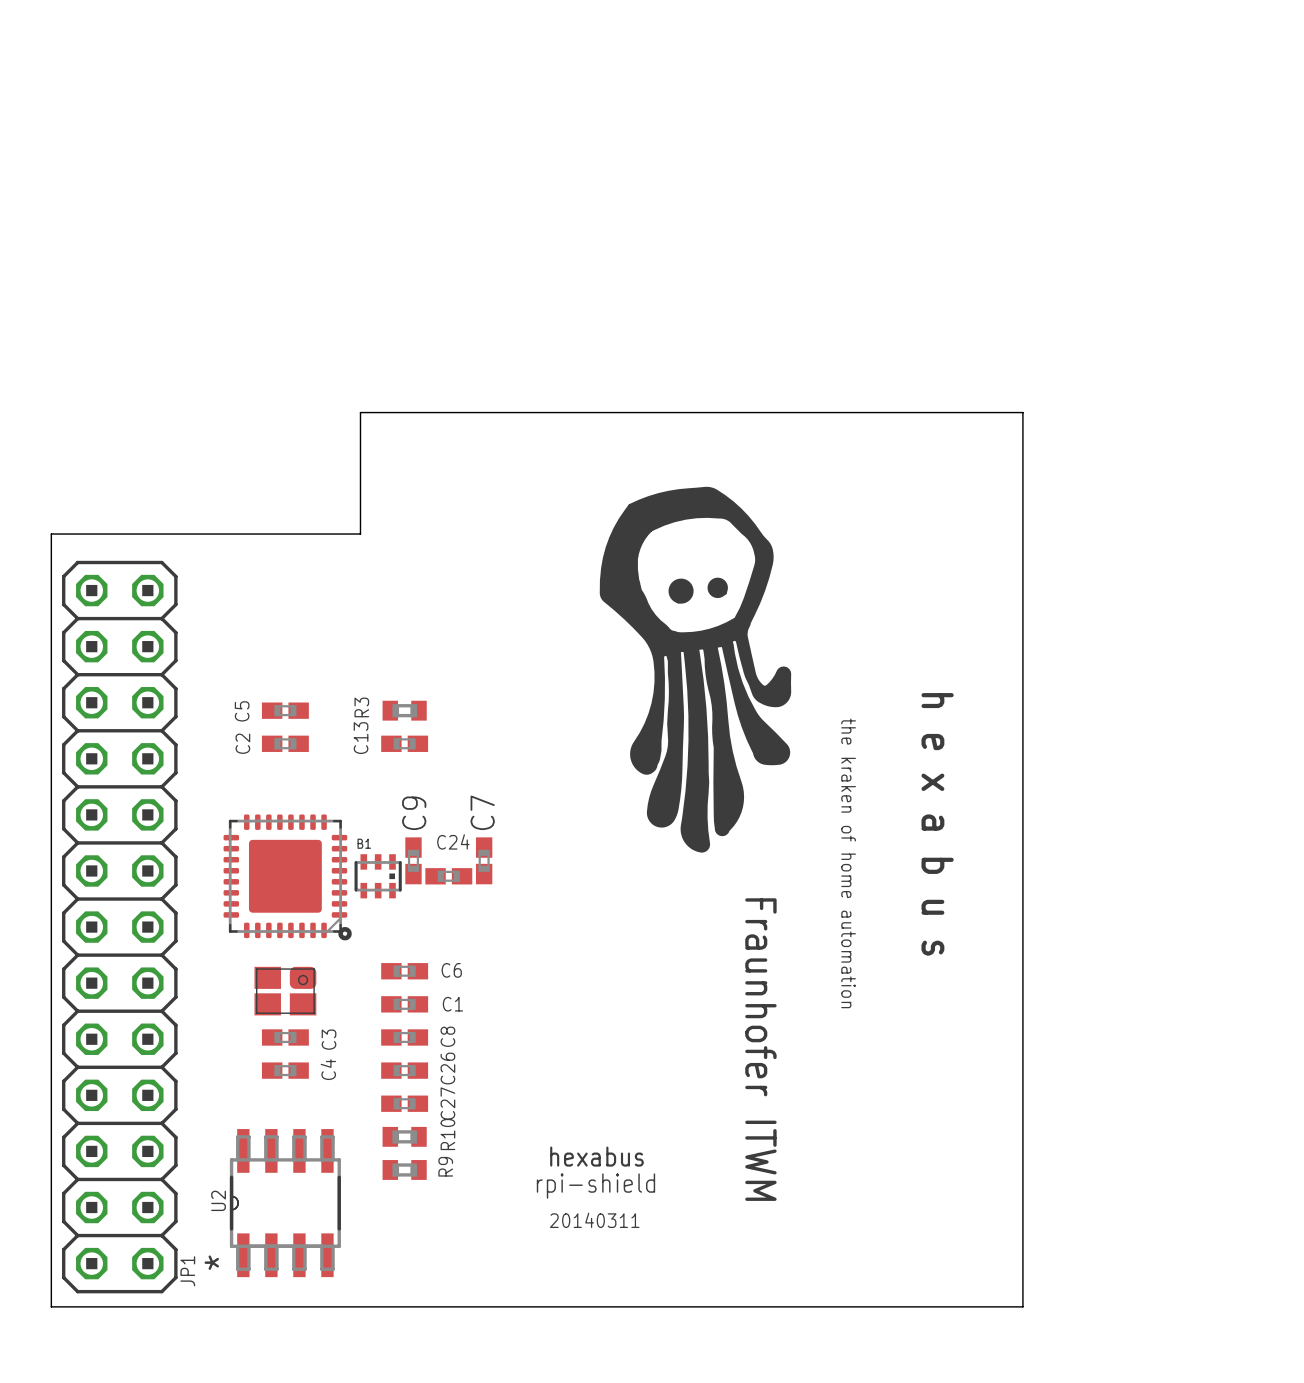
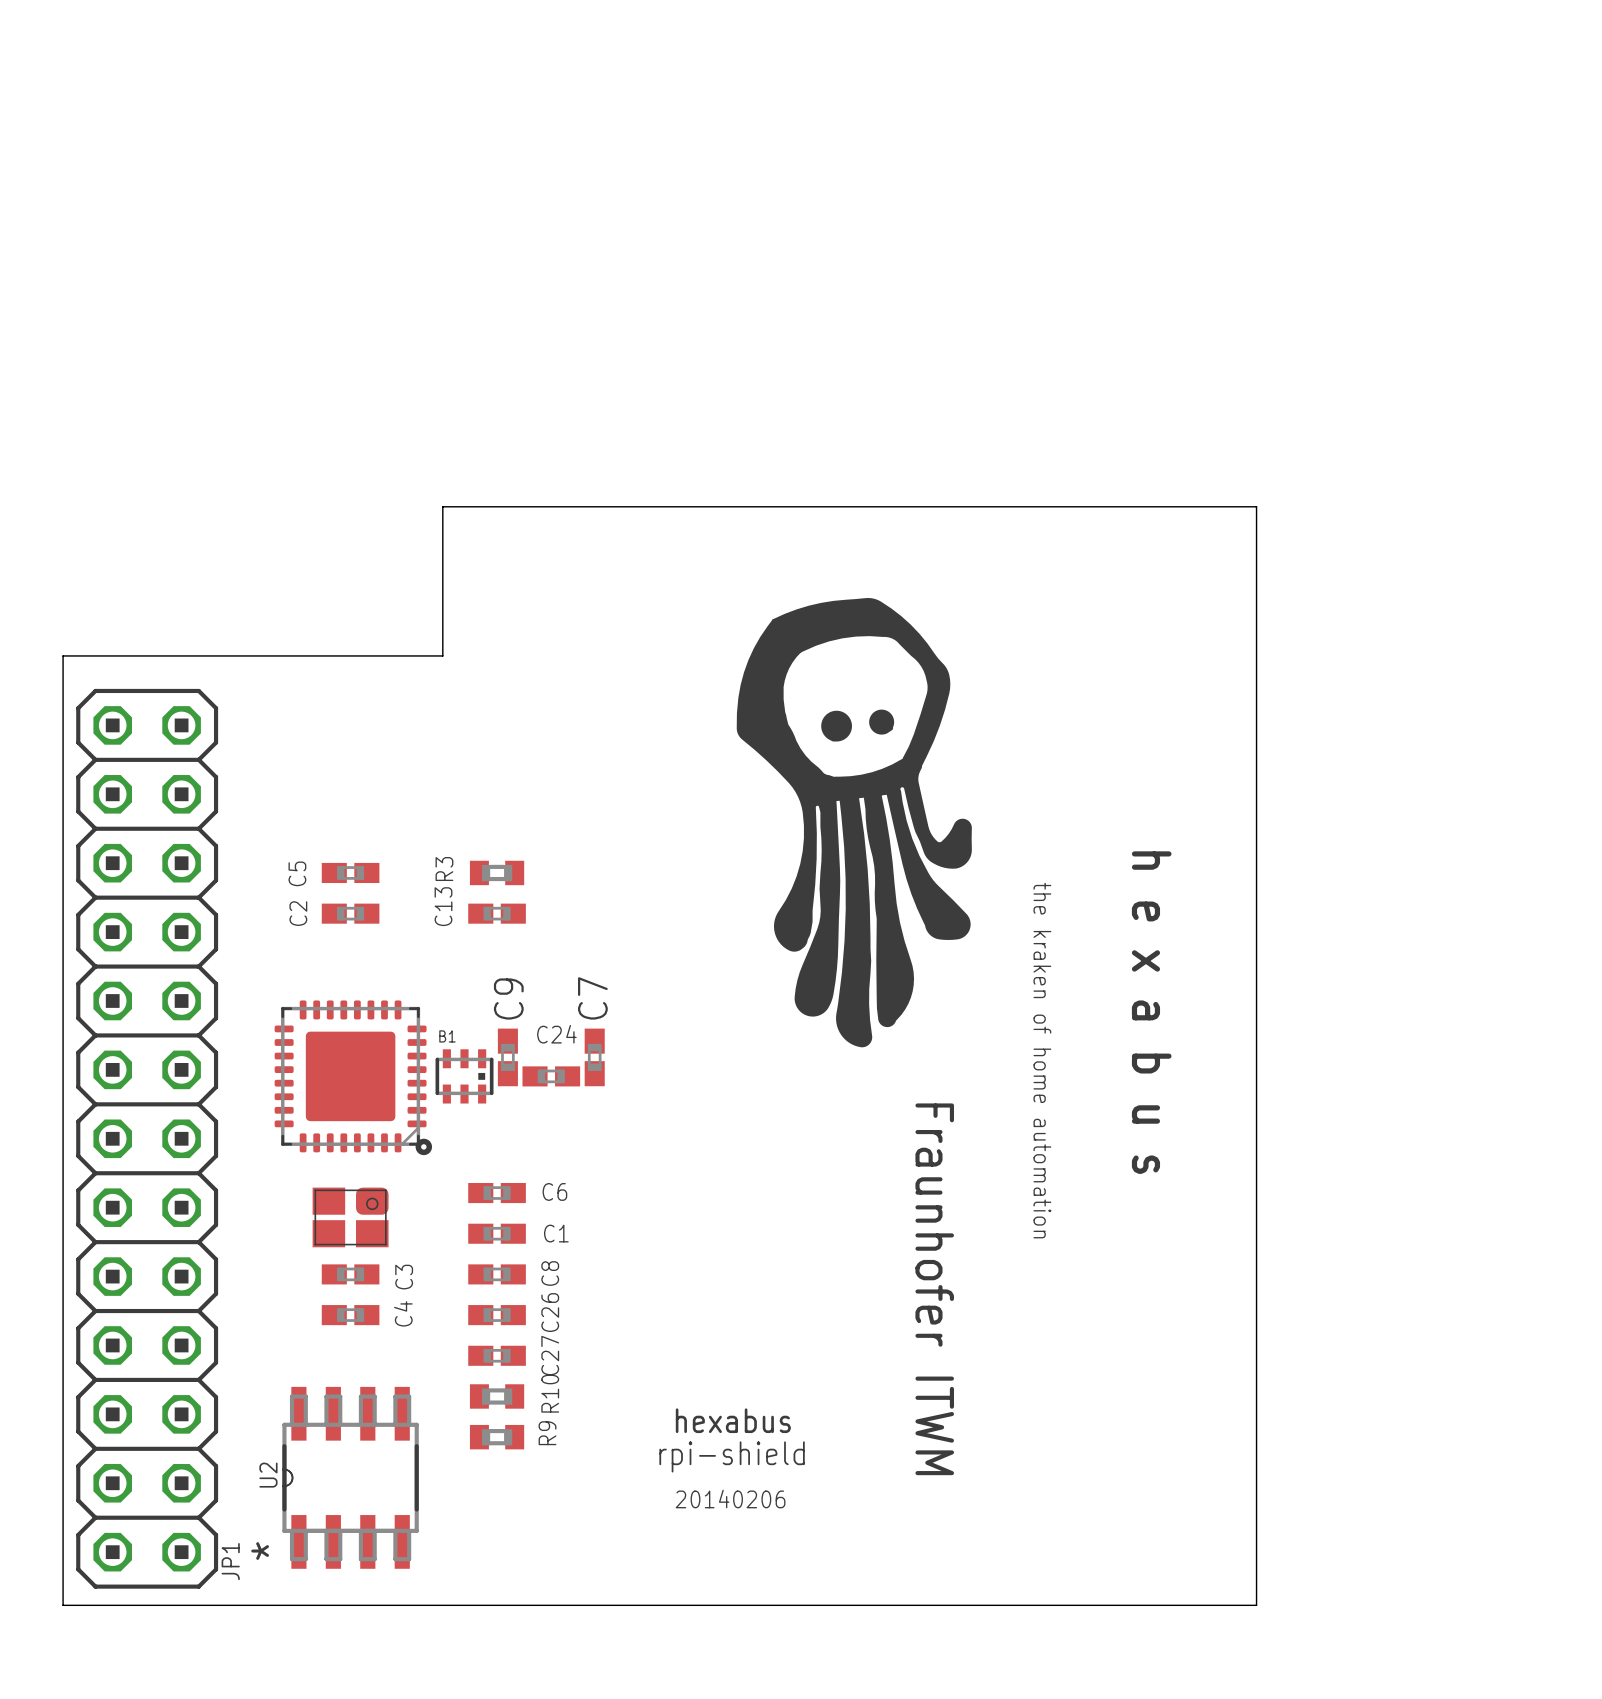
text: 20140311 (594, 1220) -> 20140206 (730, 1499)

